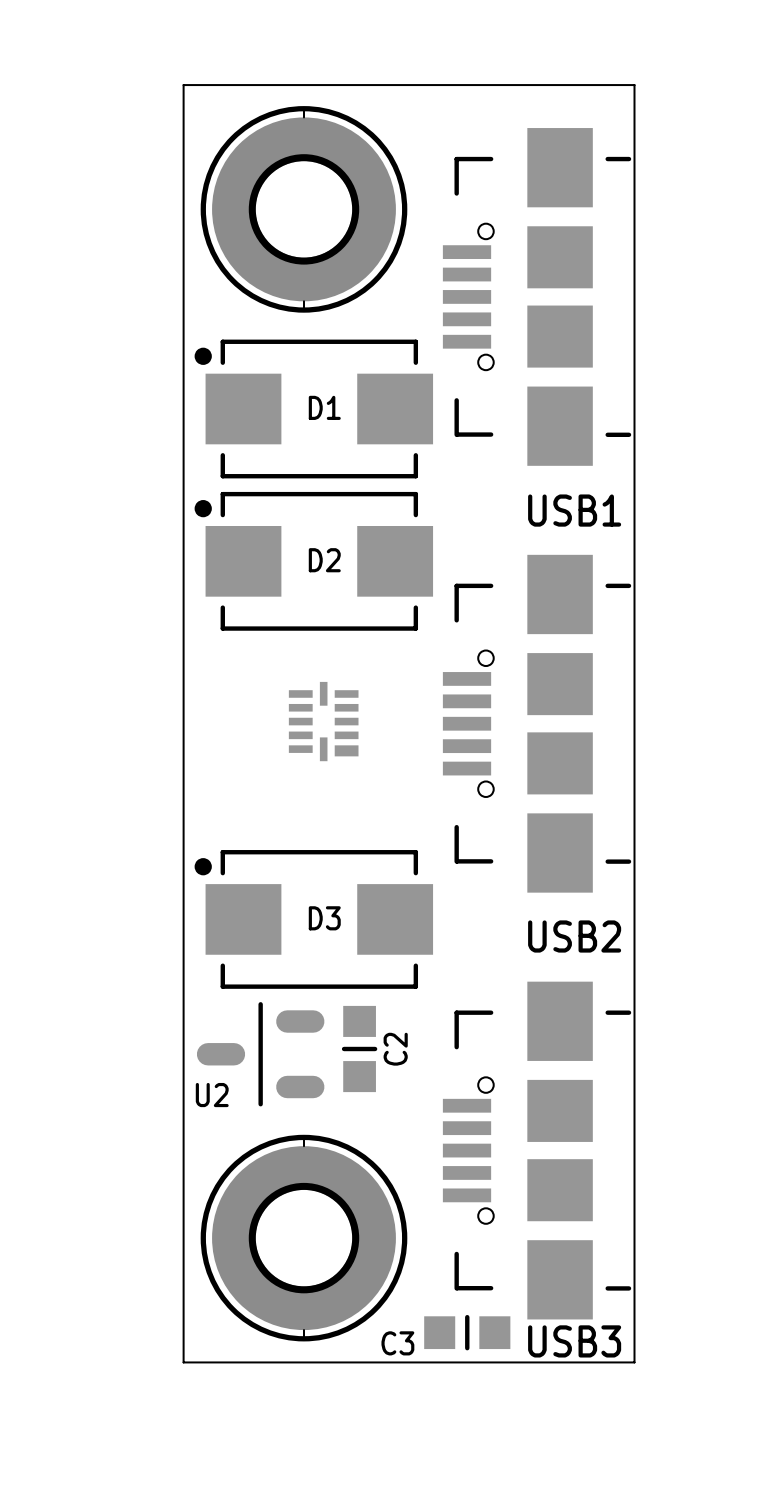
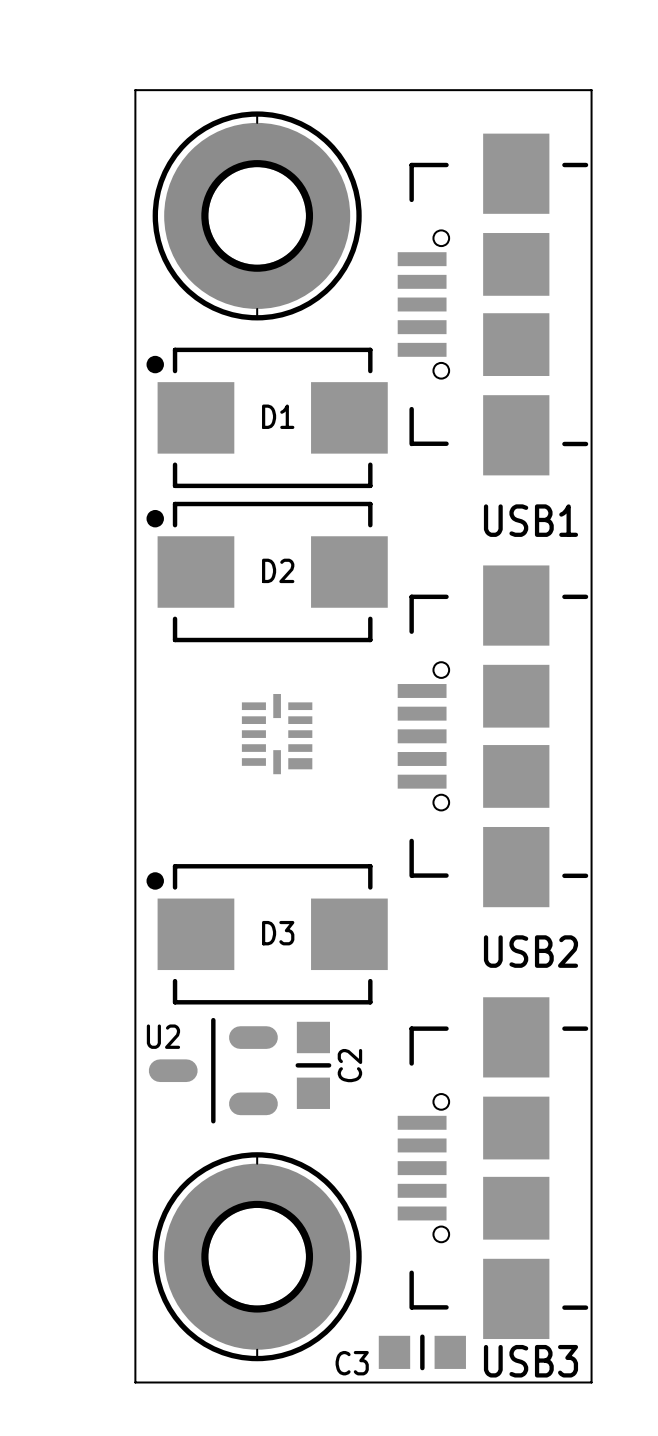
U2 name position: U2 (212, 1095) -> U2 (163, 1036)

